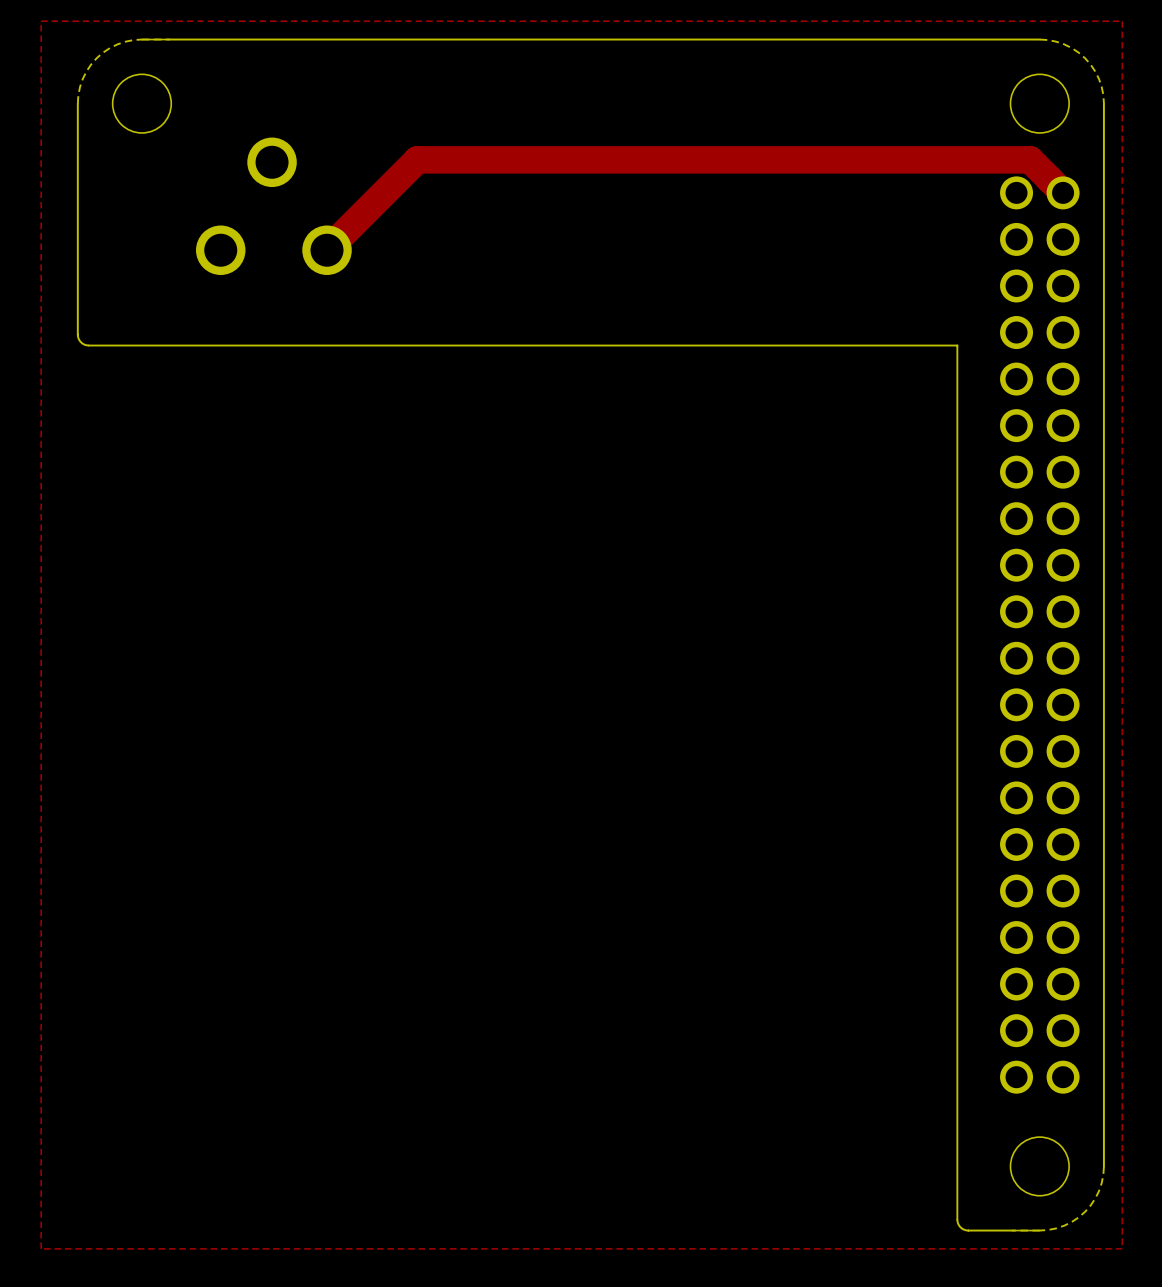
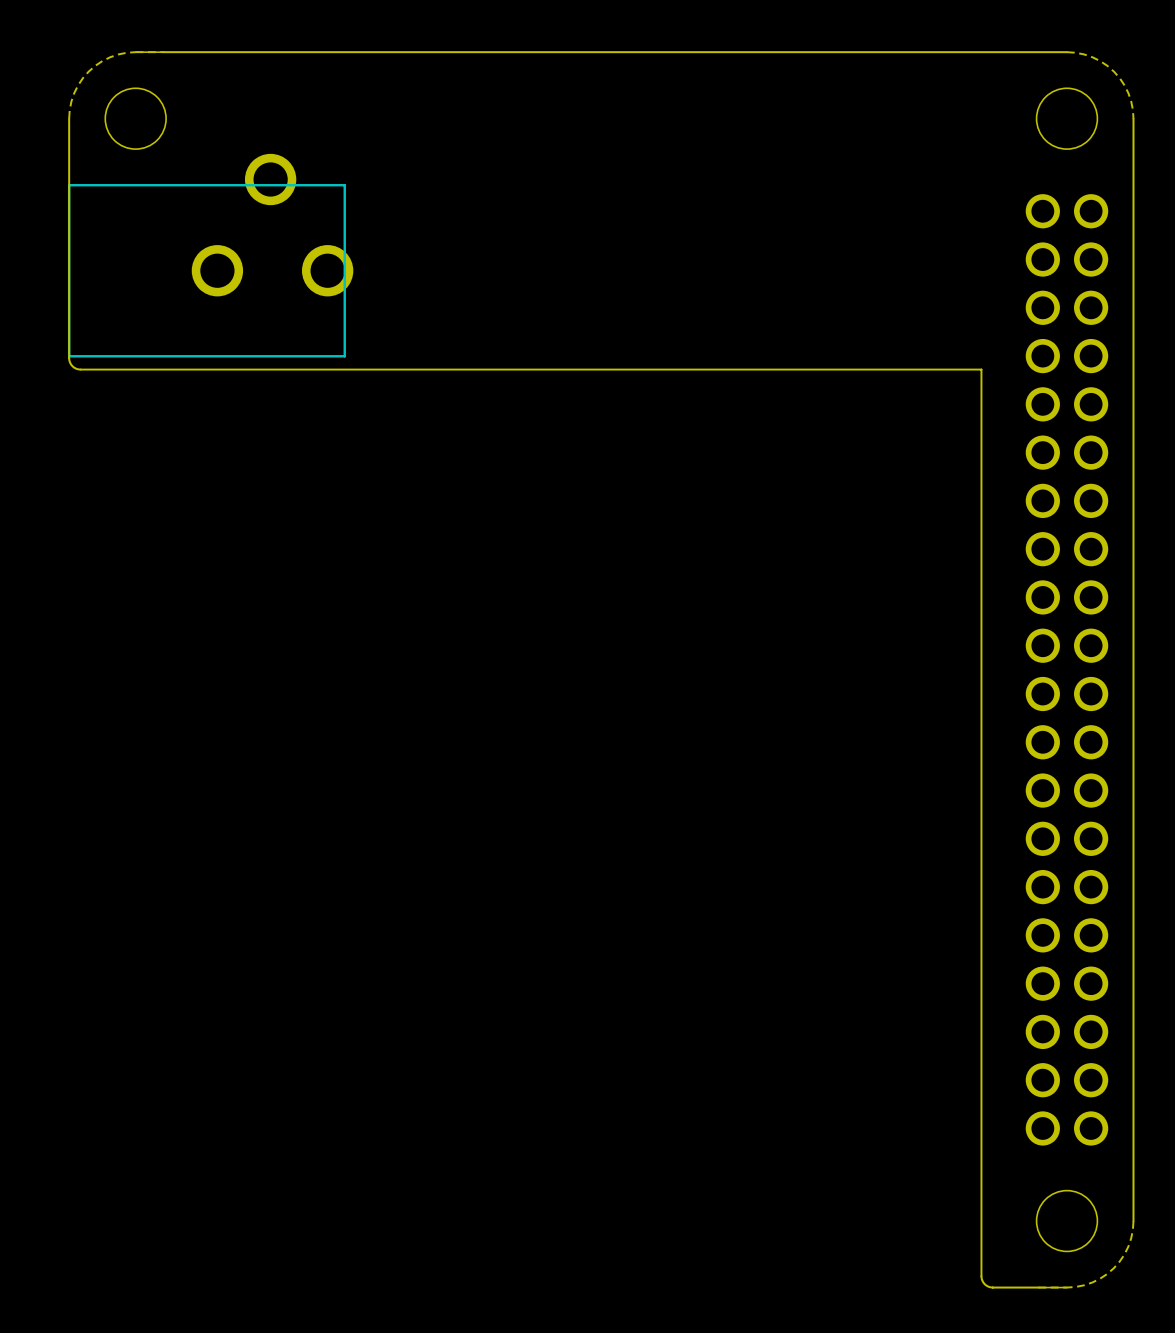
zone outline: (41, 21) (1122, 21) (1122, 1248) (41, 1248) (41, 21) -> none
track: (1049, 179) (1030, 159) (417, 159) (327, 250) -> none
part: (273, 206) -> none
part: none -> (210, 255)

